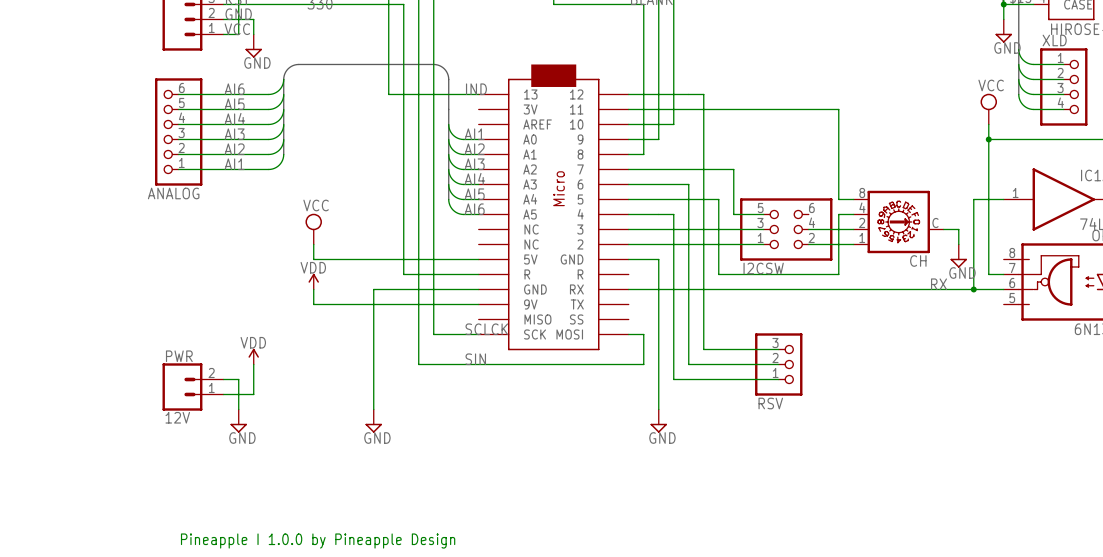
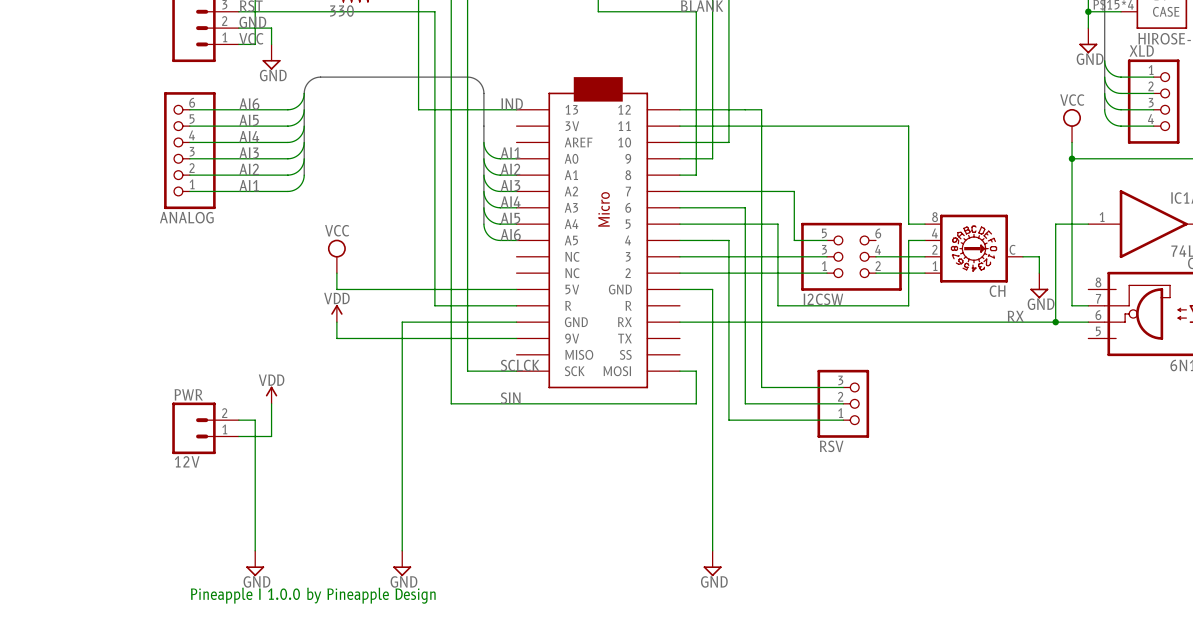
wire: none -> (255, 452) (255, 550)
wire: none -> (402, 452) (402, 550)
wire: none -> (712, 452) (712, 550)
power symbol: GND (238, 421) -> none
power symbol: GND (373, 421) -> none
power symbol position: GND (658, 421) -> GND (712, 563)
power symbol: none -> GND (255, 563)
power symbol: none -> GND (402, 563)

